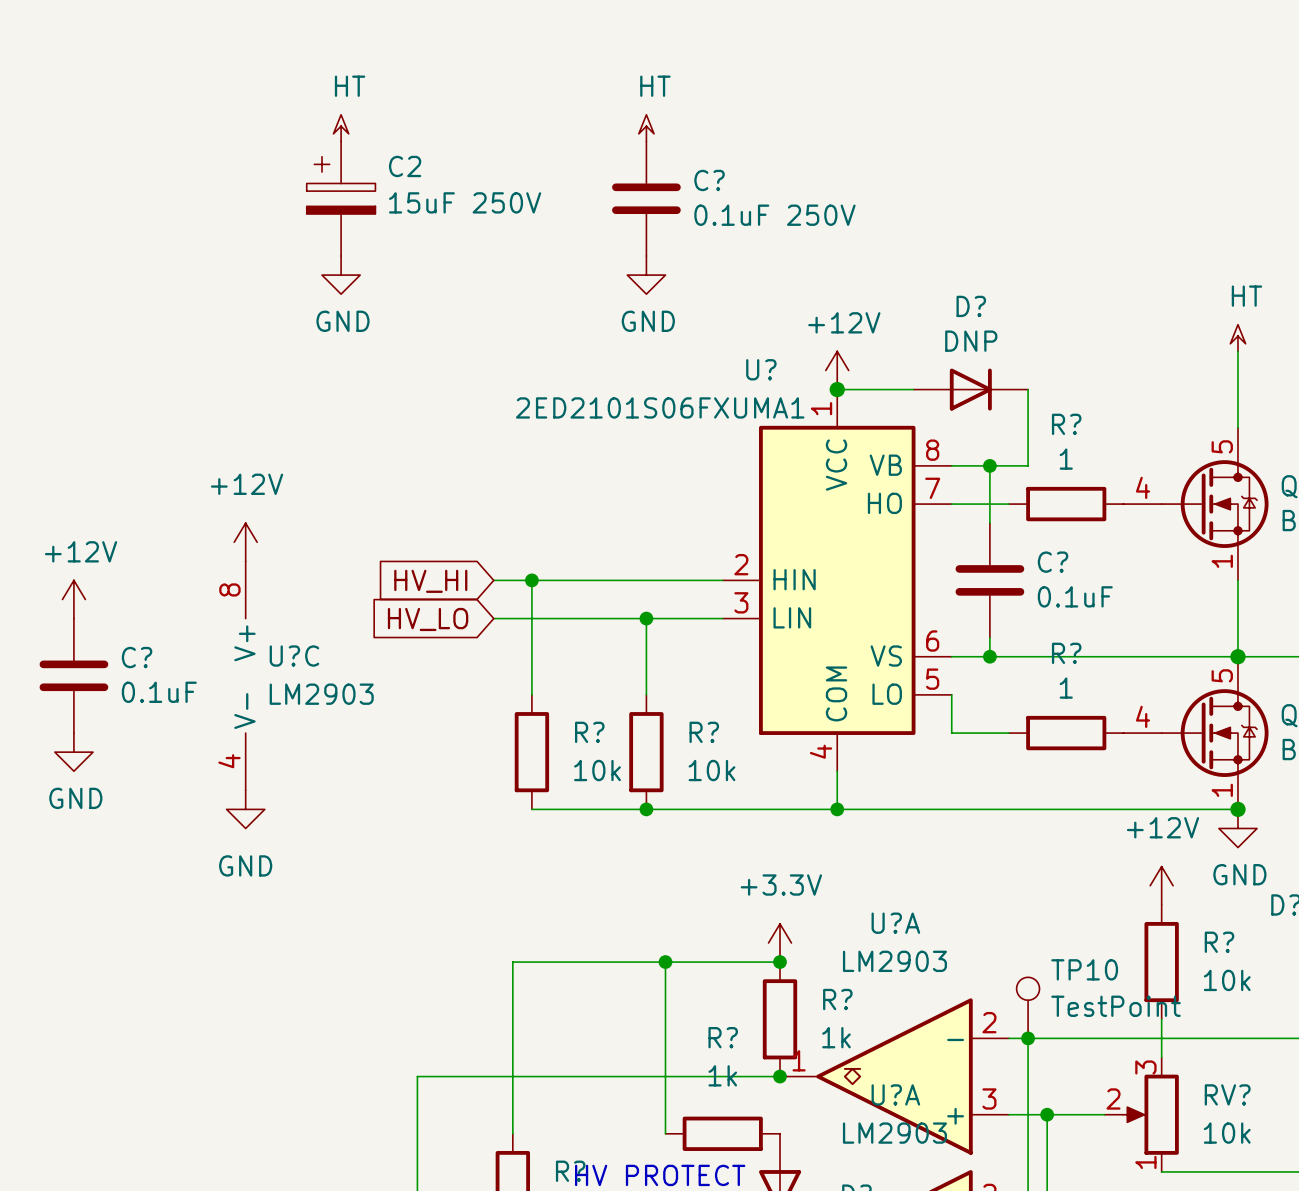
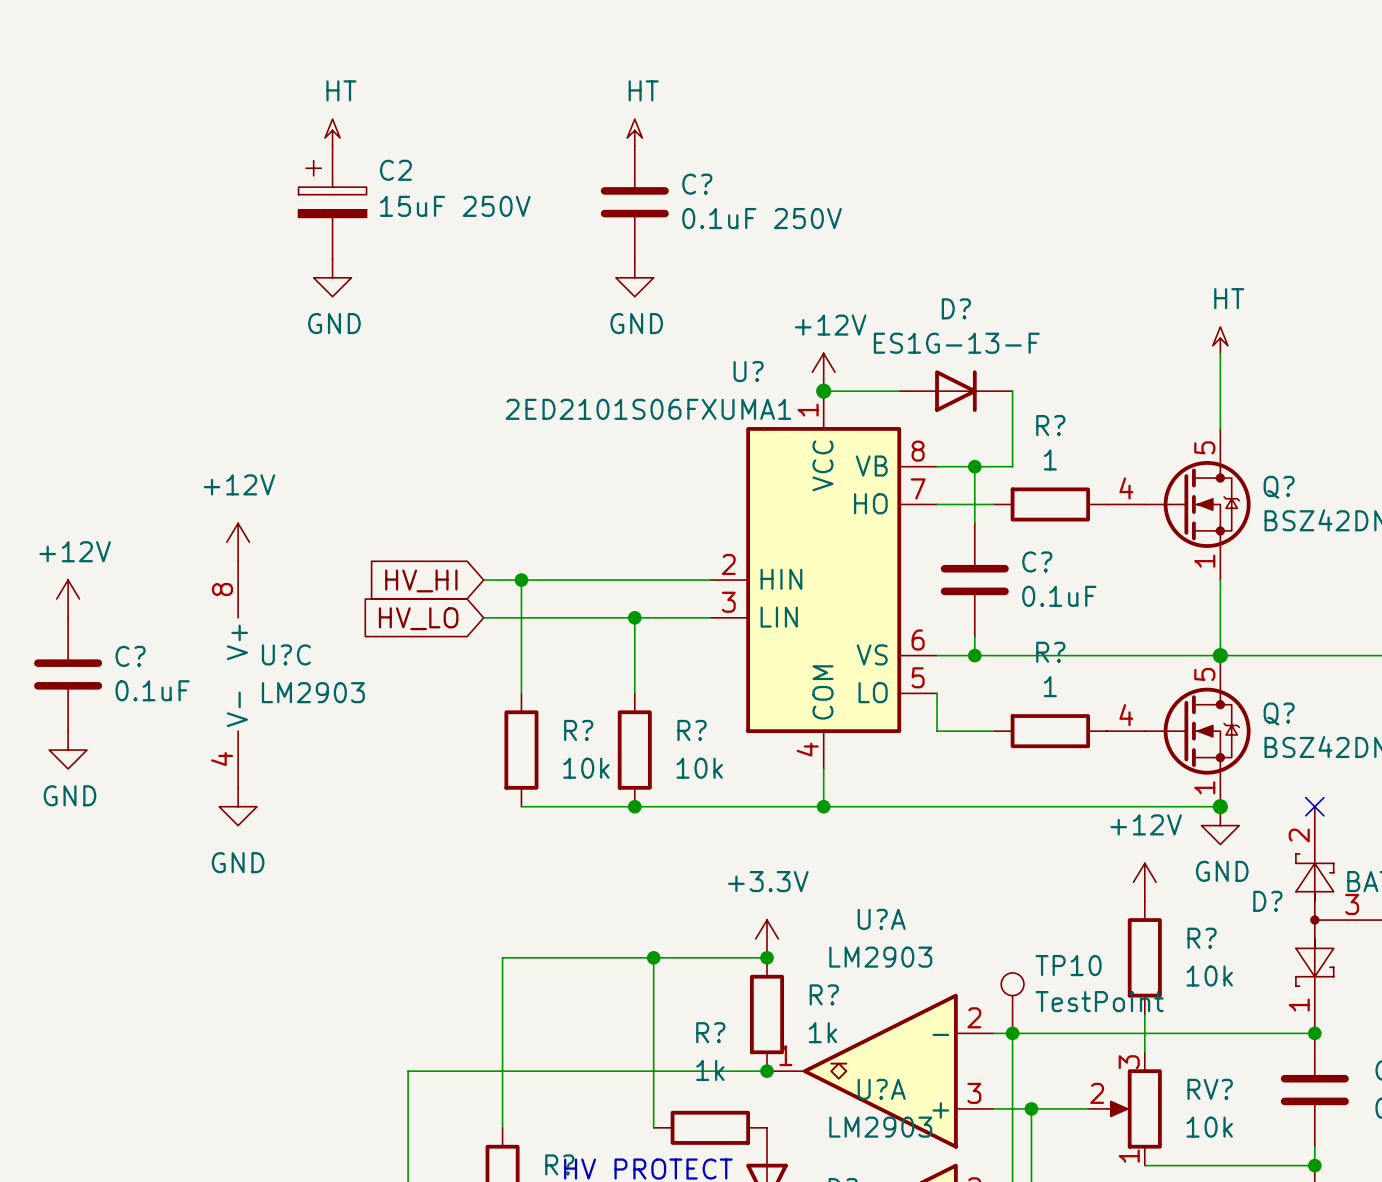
D? value: DNP (971, 341) -> ES1G-13-F (956, 343)

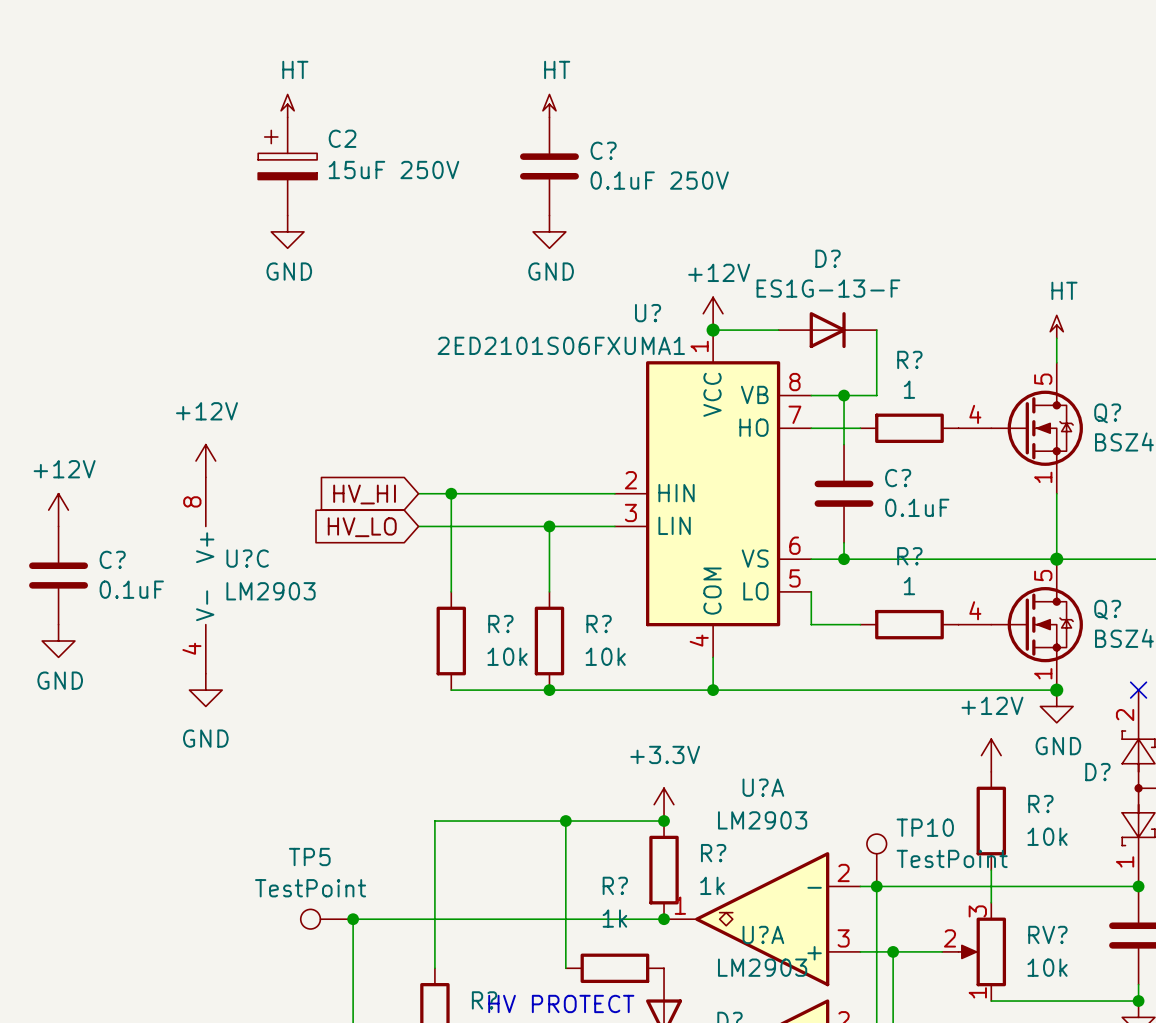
power symbol position: HT (1220, 340) -> HT (1056, 326)
wire: (1220, 353) (1220, 400) -> none
TP5: none -> TestPoint (326, 919)
junction: none -> (353, 919)

